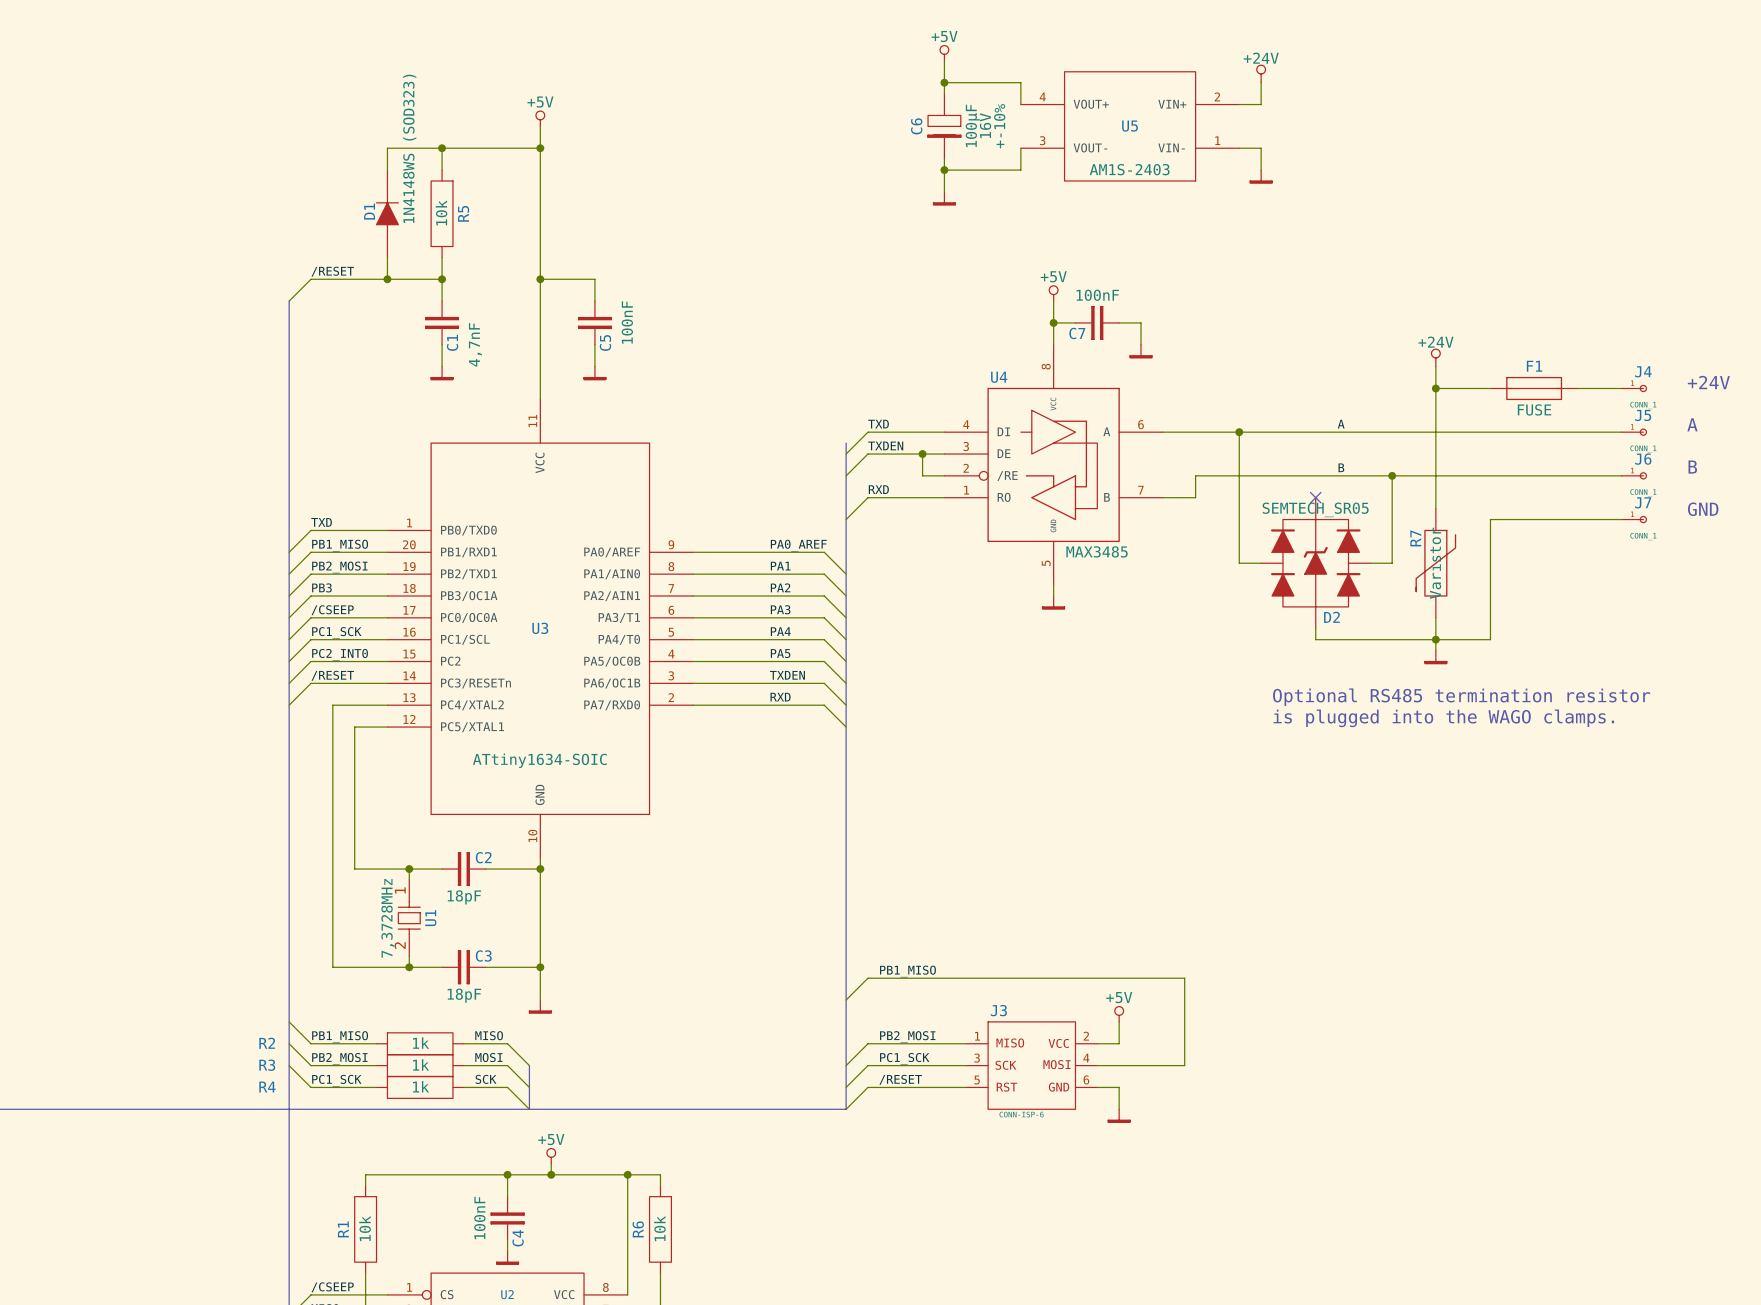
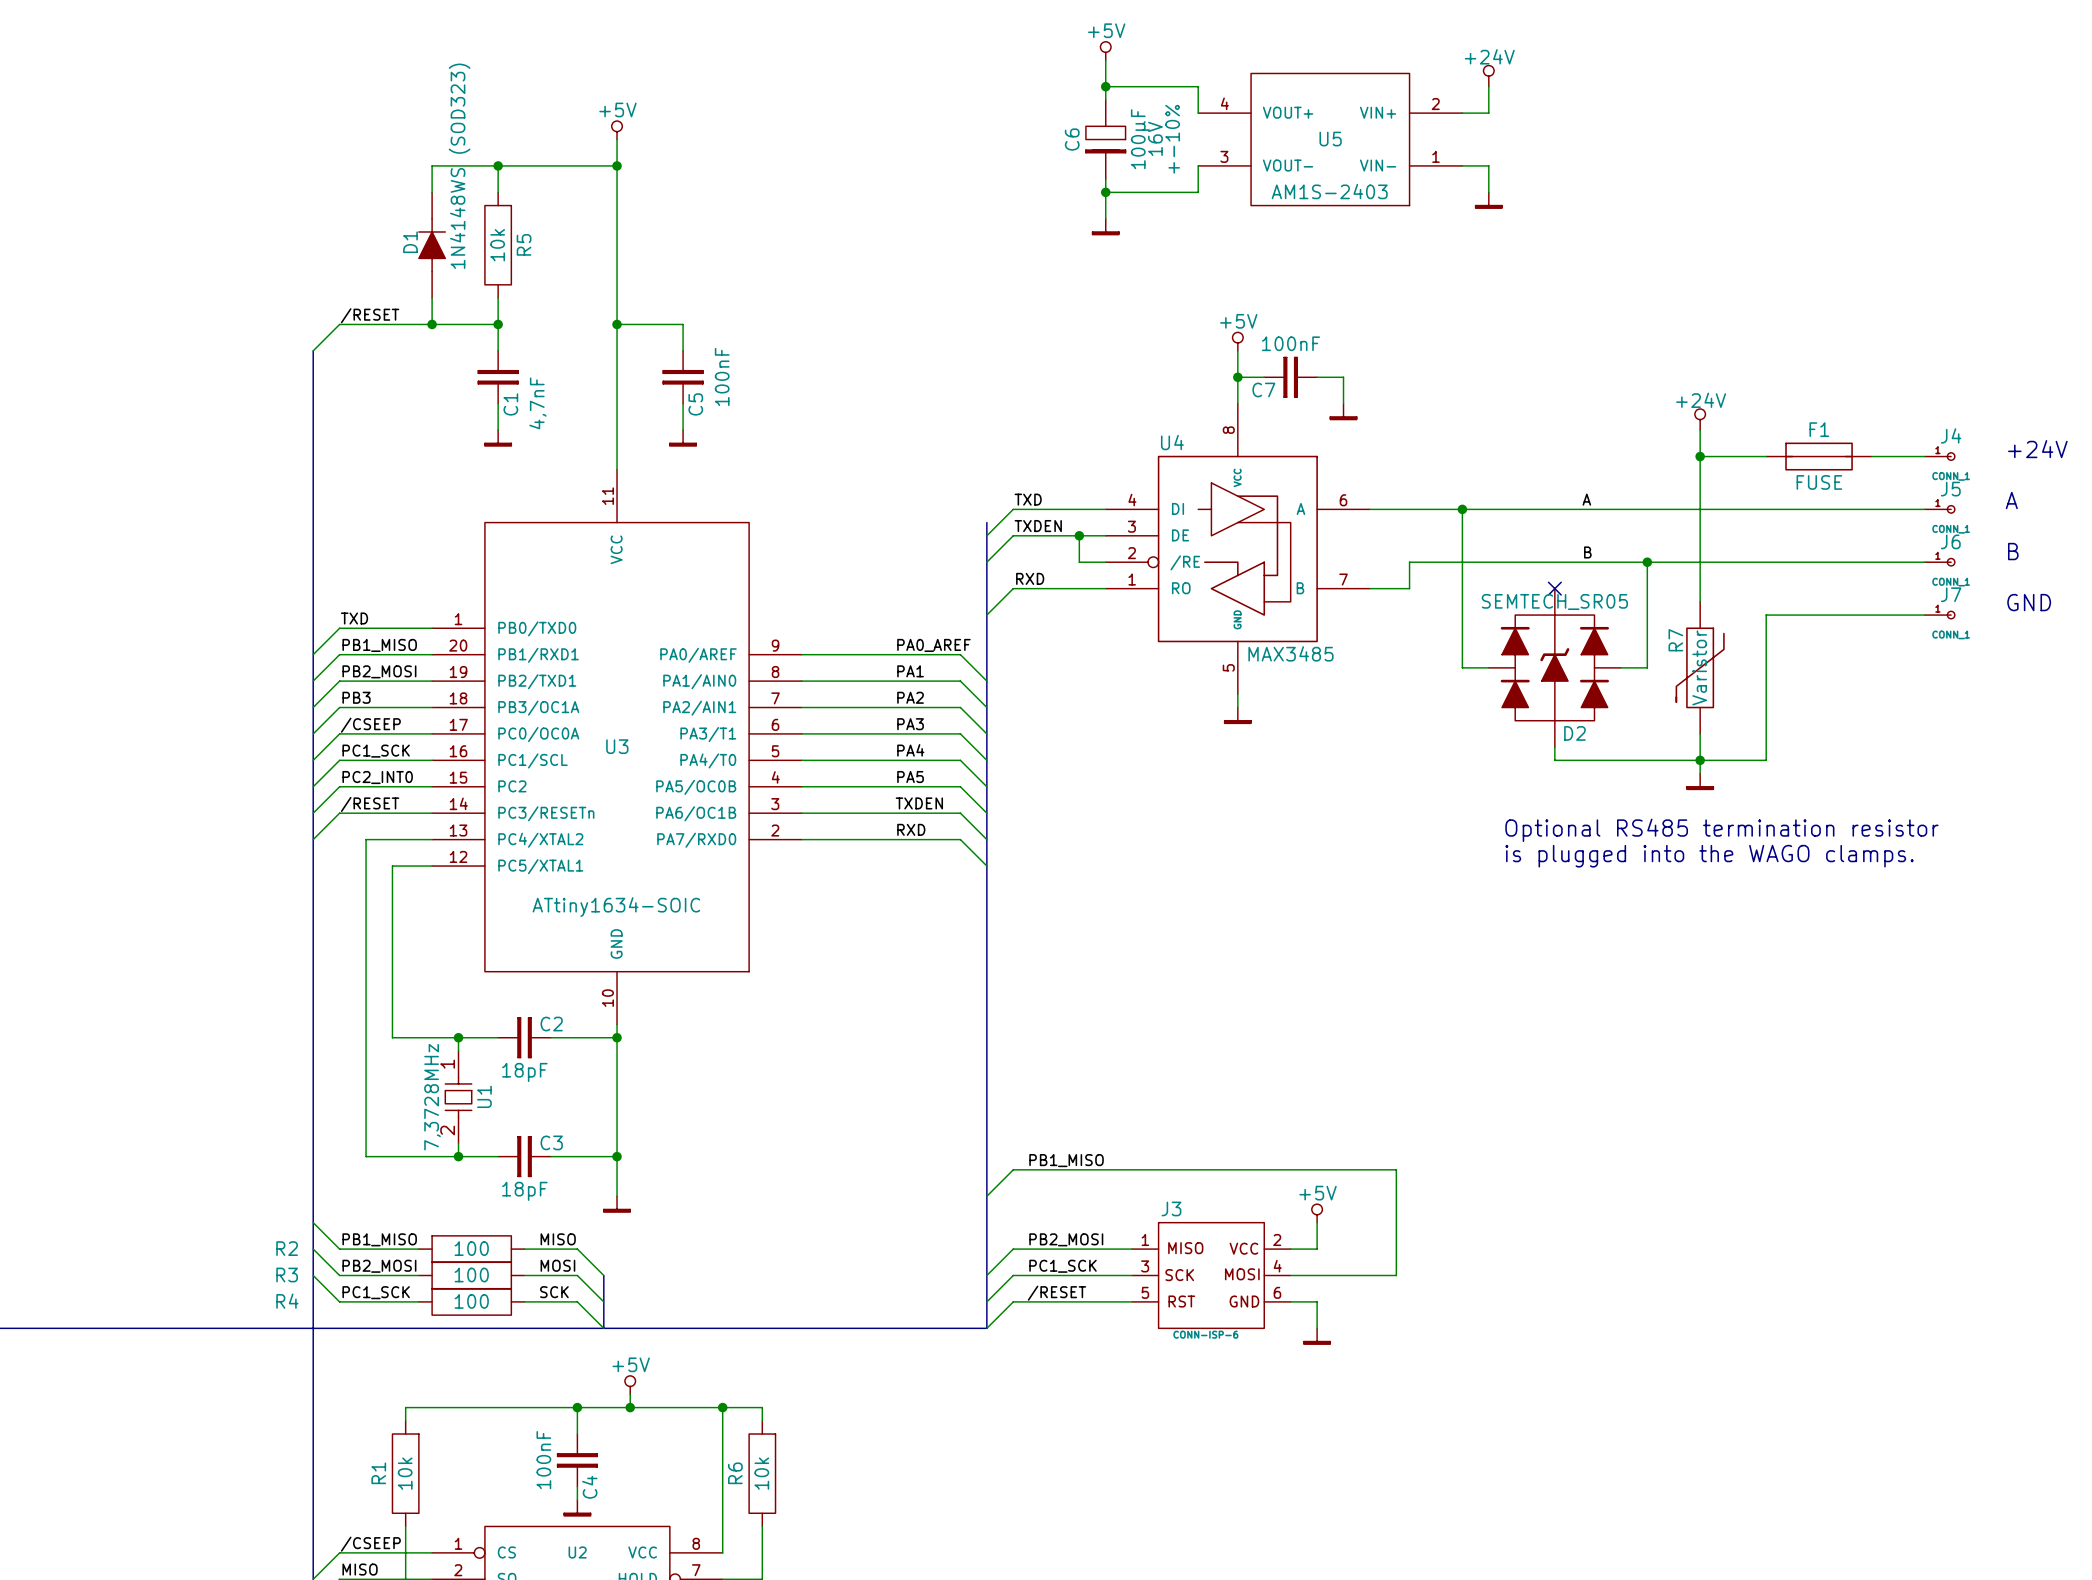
R2 value: 1k (420, 1043) -> 100 (471, 1248)
R3 value: 1k (420, 1064) -> 100 (471, 1275)
R4 value: 1k (420, 1086) -> 100 (471, 1301)

